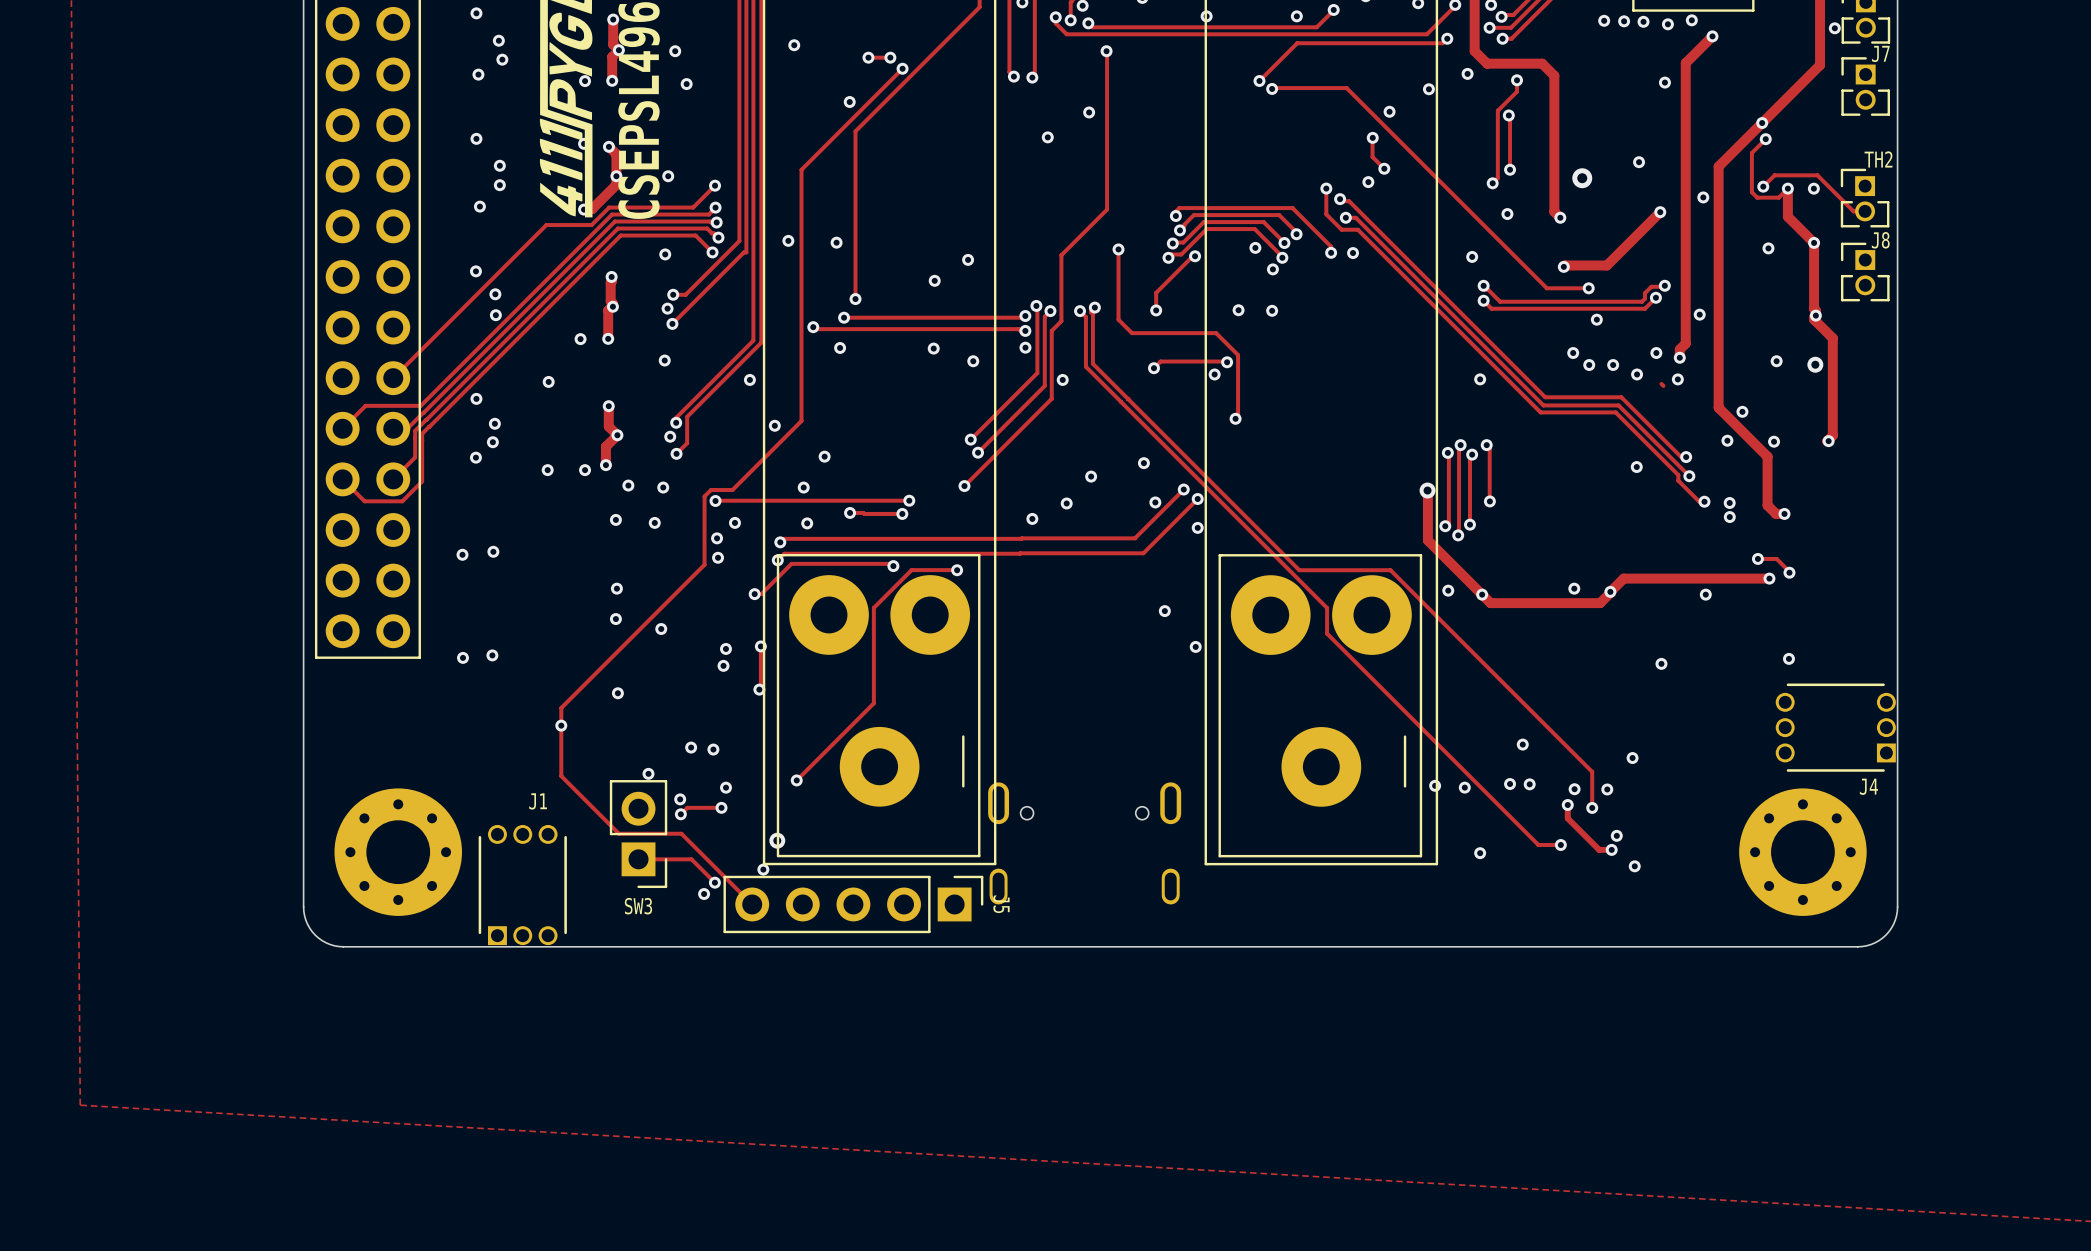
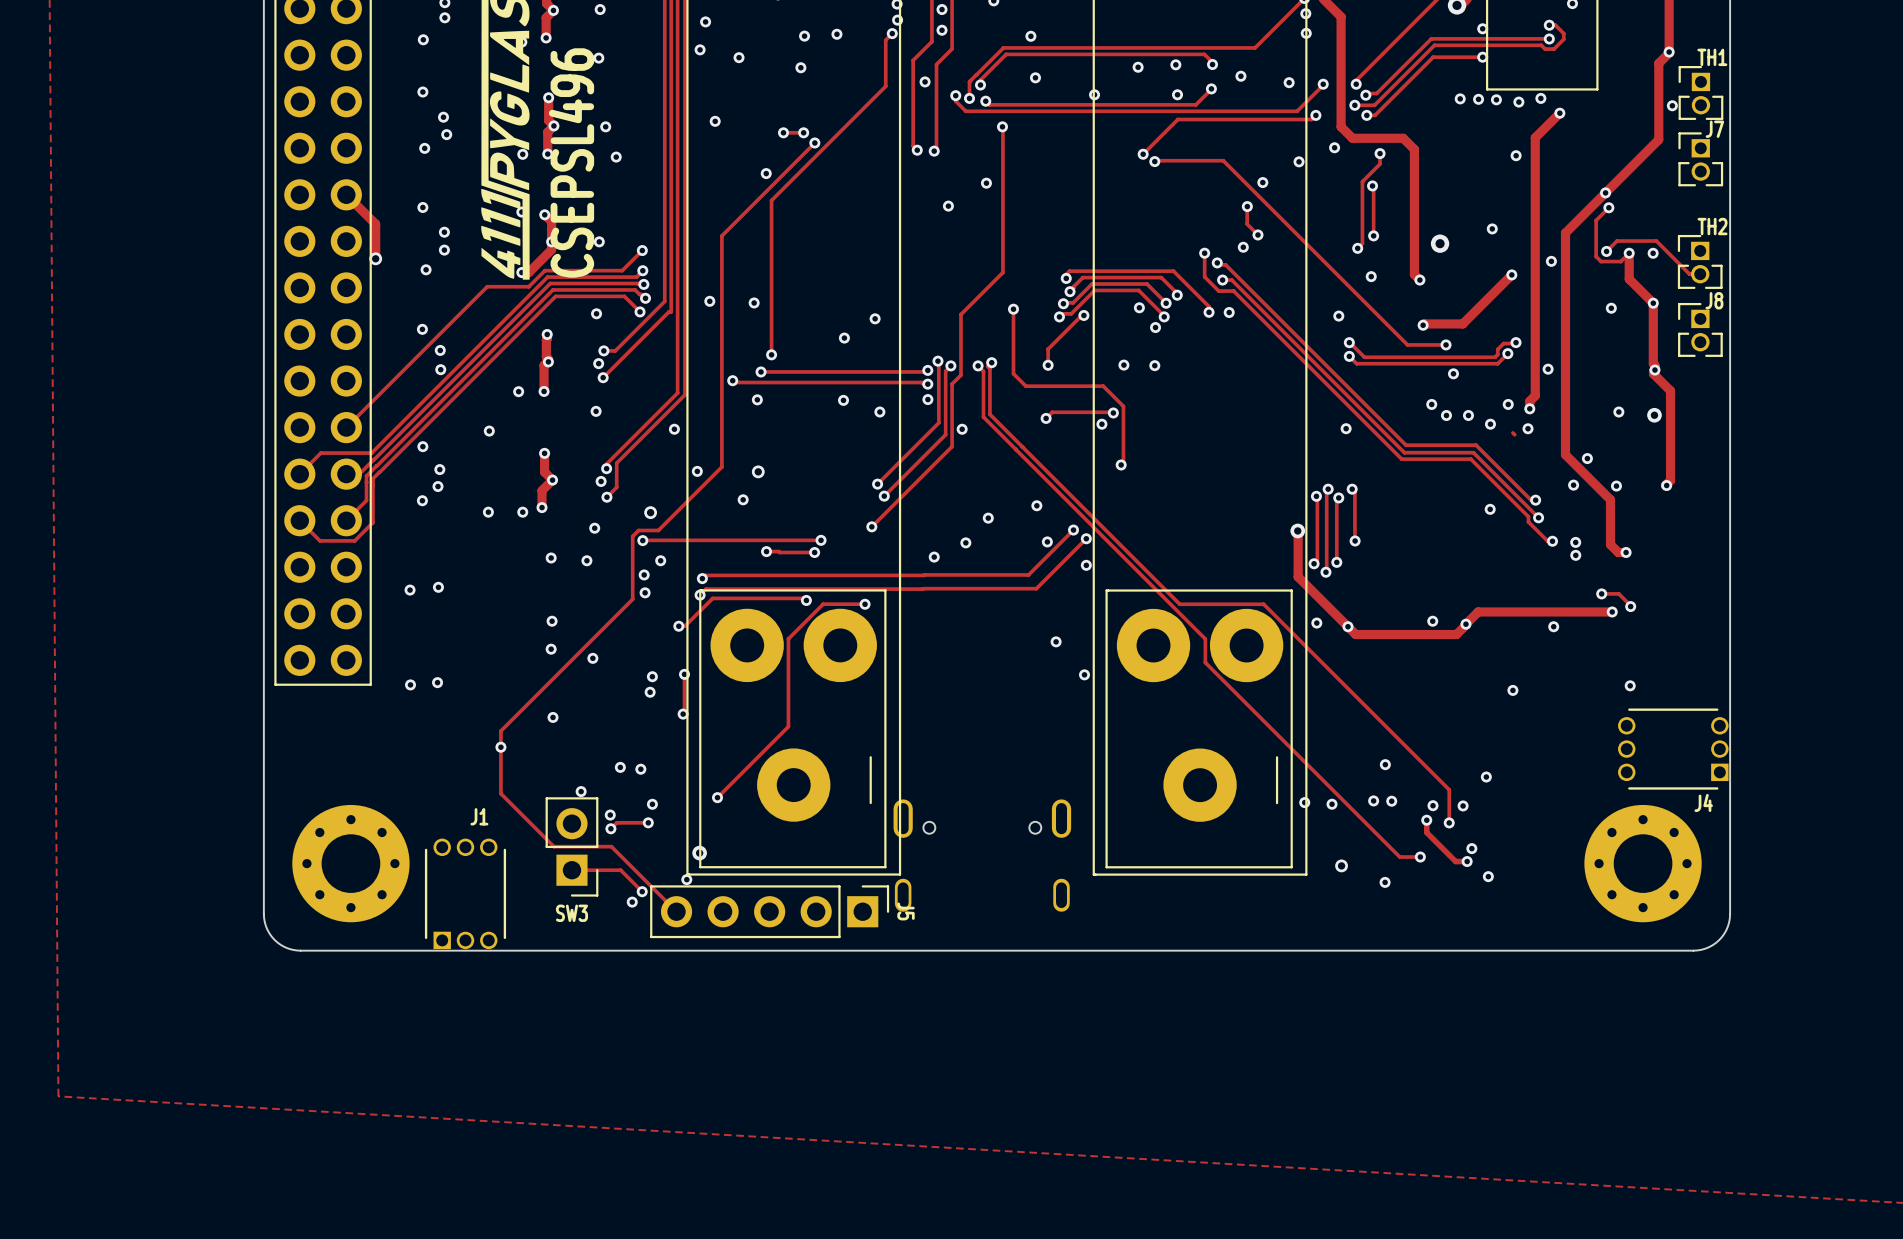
track: none -> (346, 194) (375, 224) (375, 258)
via: none -> (375, 258)
via: none -> (758, 471)
via: none -> (650, 512)
via: (628, 485) -> none
via: (803, 487) -> none
via: (807, 523) -> none
via position: (1480, 853) -> (1385, 882)
via: none -> (1341, 865)

